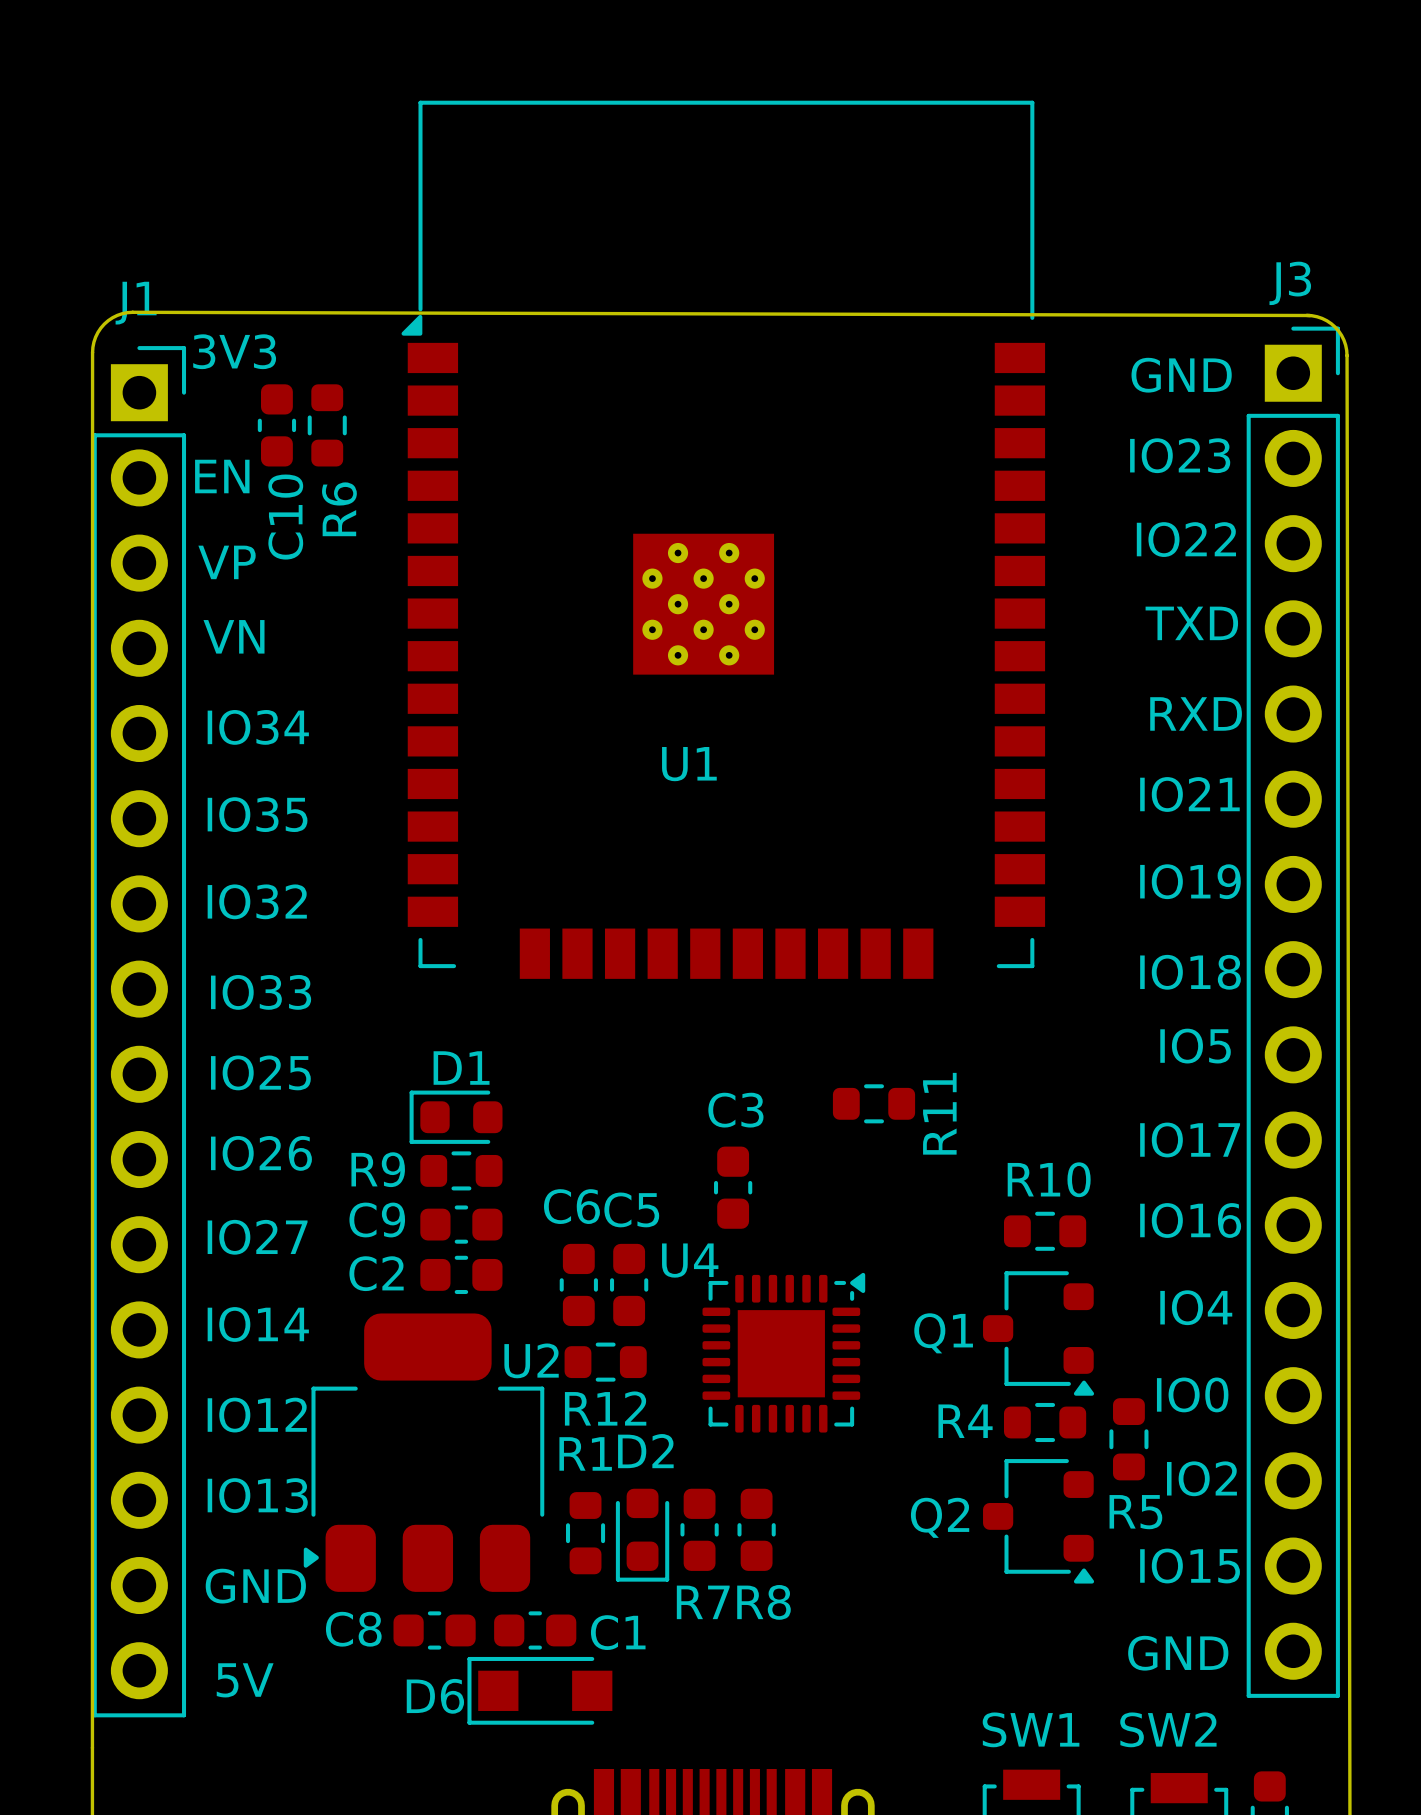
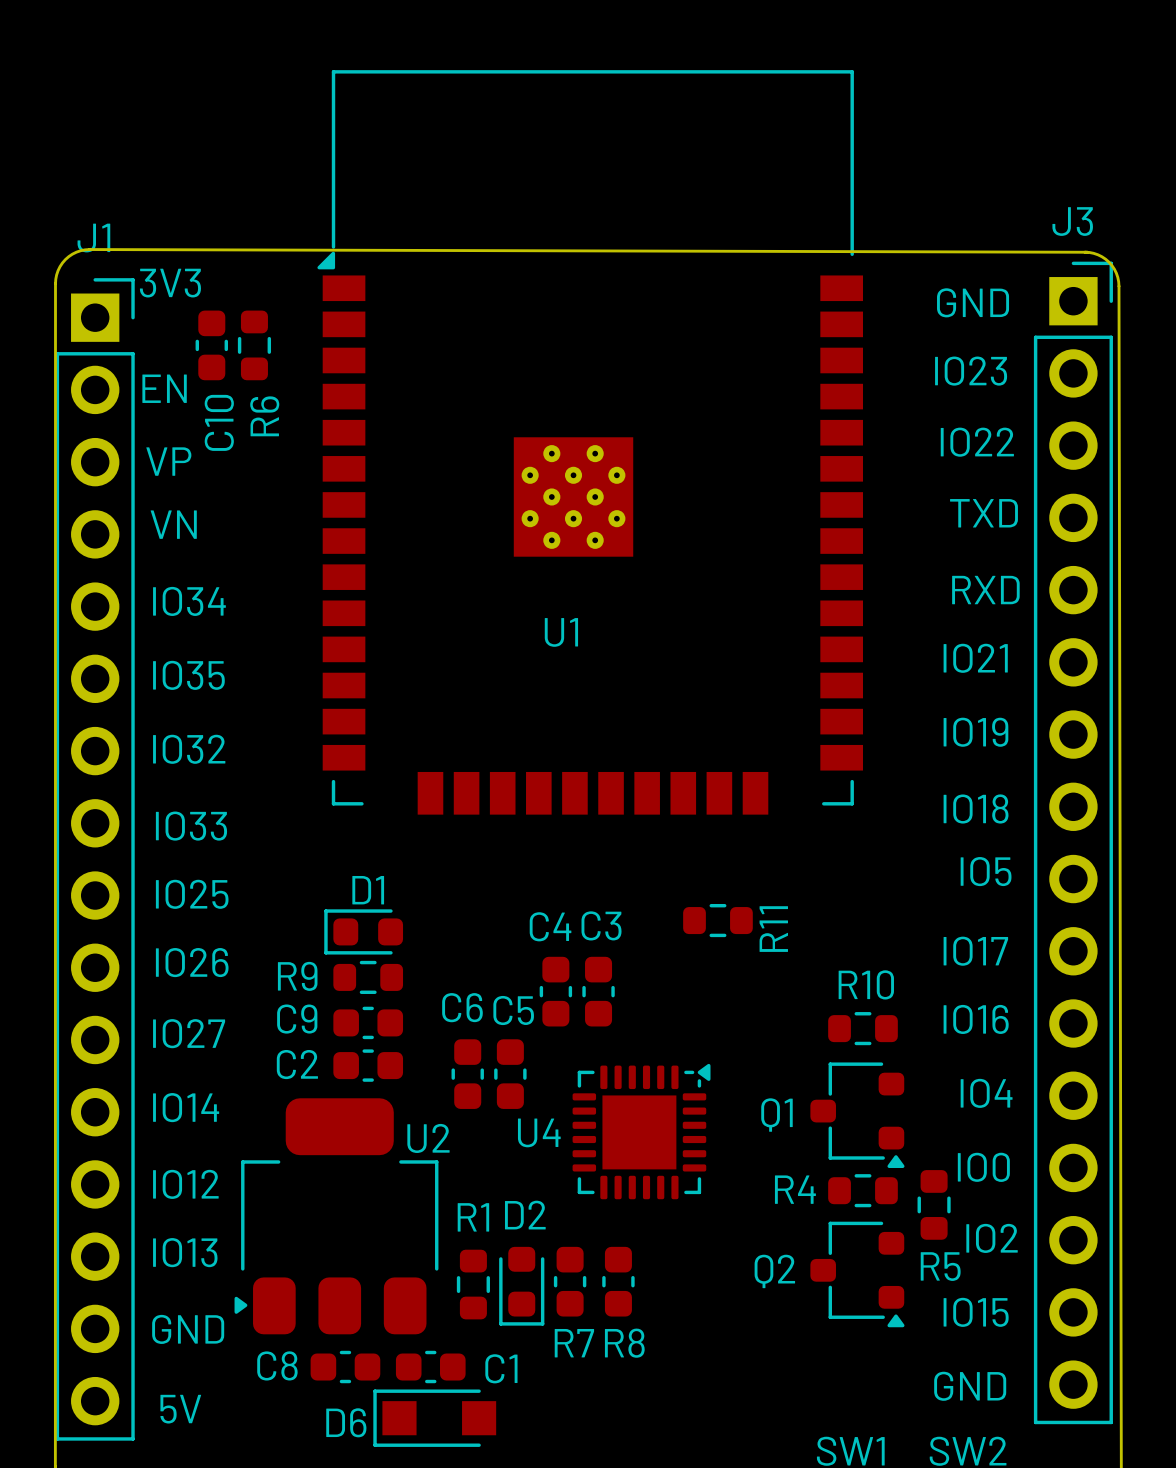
C4: none -> (555, 991)
U4 name position: U4 (690, 1260) -> U4 (539, 1132)
R12: (605, 1362) -> none

